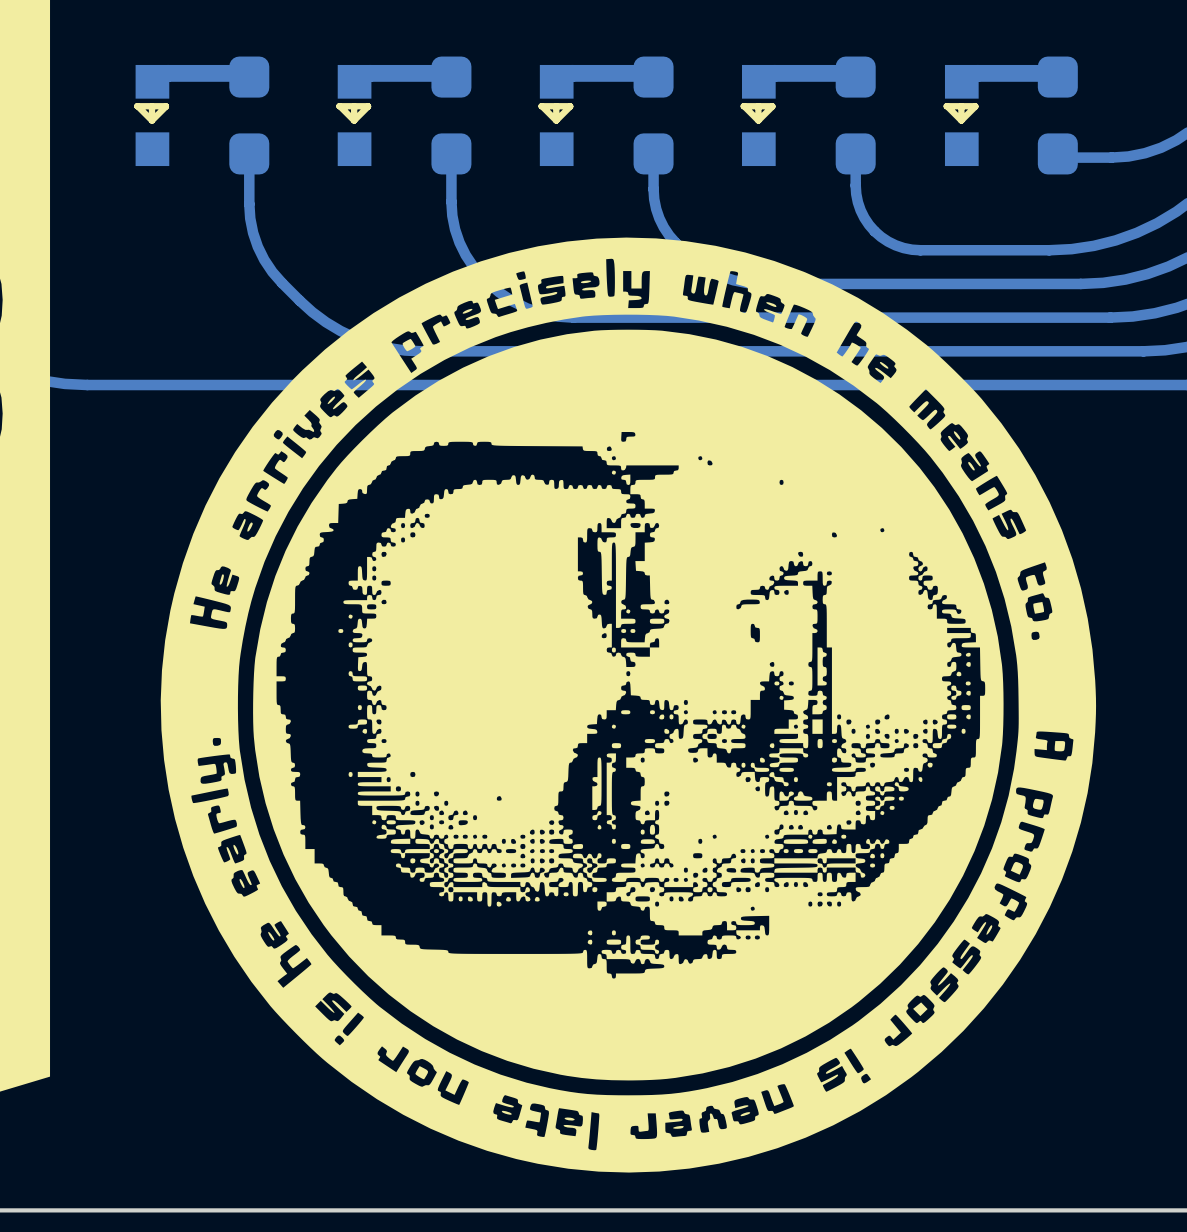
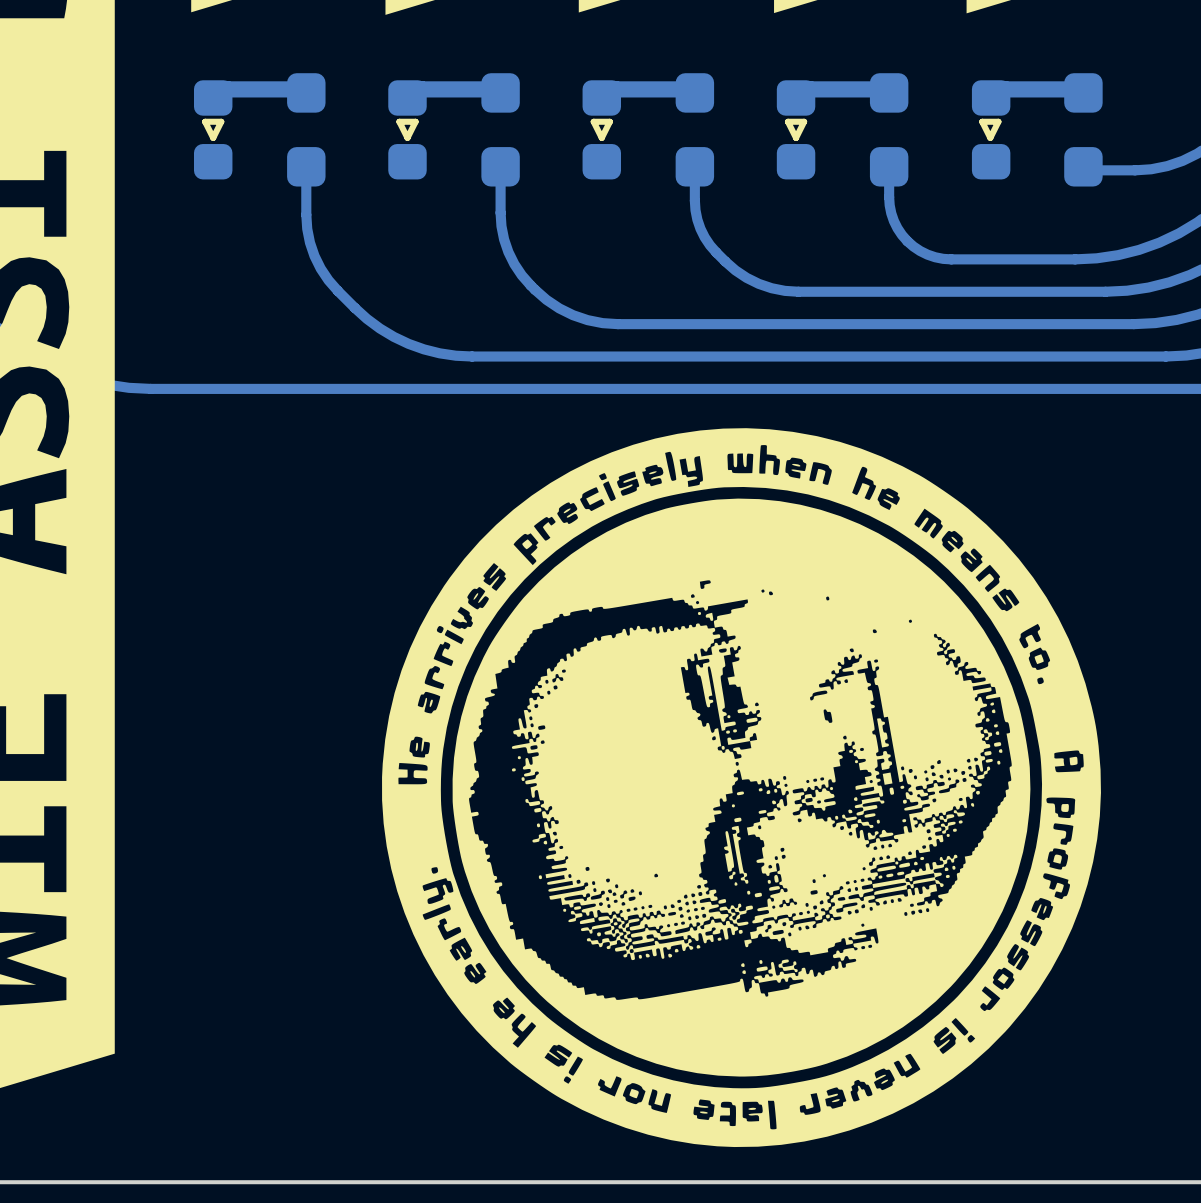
part footprint: [134, 64, 170, 167] -> [193, 80, 233, 180]
part footprint: [336, 64, 372, 167] -> [388, 80, 427, 180]
part footprint: [538, 64, 574, 167] -> [582, 80, 622, 180]
part footprint: [740, 64, 776, 167] -> [776, 80, 816, 180]
part footprint: [943, 64, 979, 167] -> [971, 80, 1011, 180]
line: none -> (221, 121) (205, 121) (213, 137) (221, 121)
line: none -> (415, 121) (399, 121) (407, 137) (415, 121)
line: none -> (609, 121) (593, 121) (601, 137) (609, 121)
line: none -> (804, 121) (787, 121) (796, 137) (804, 121)
line: none -> (998, 121) (982, 121) (990, 137) (998, 121)
drawing: [160, 237, 1097, 1173] -> none
drawing: none -> [382, 428, 1101, 1148]

